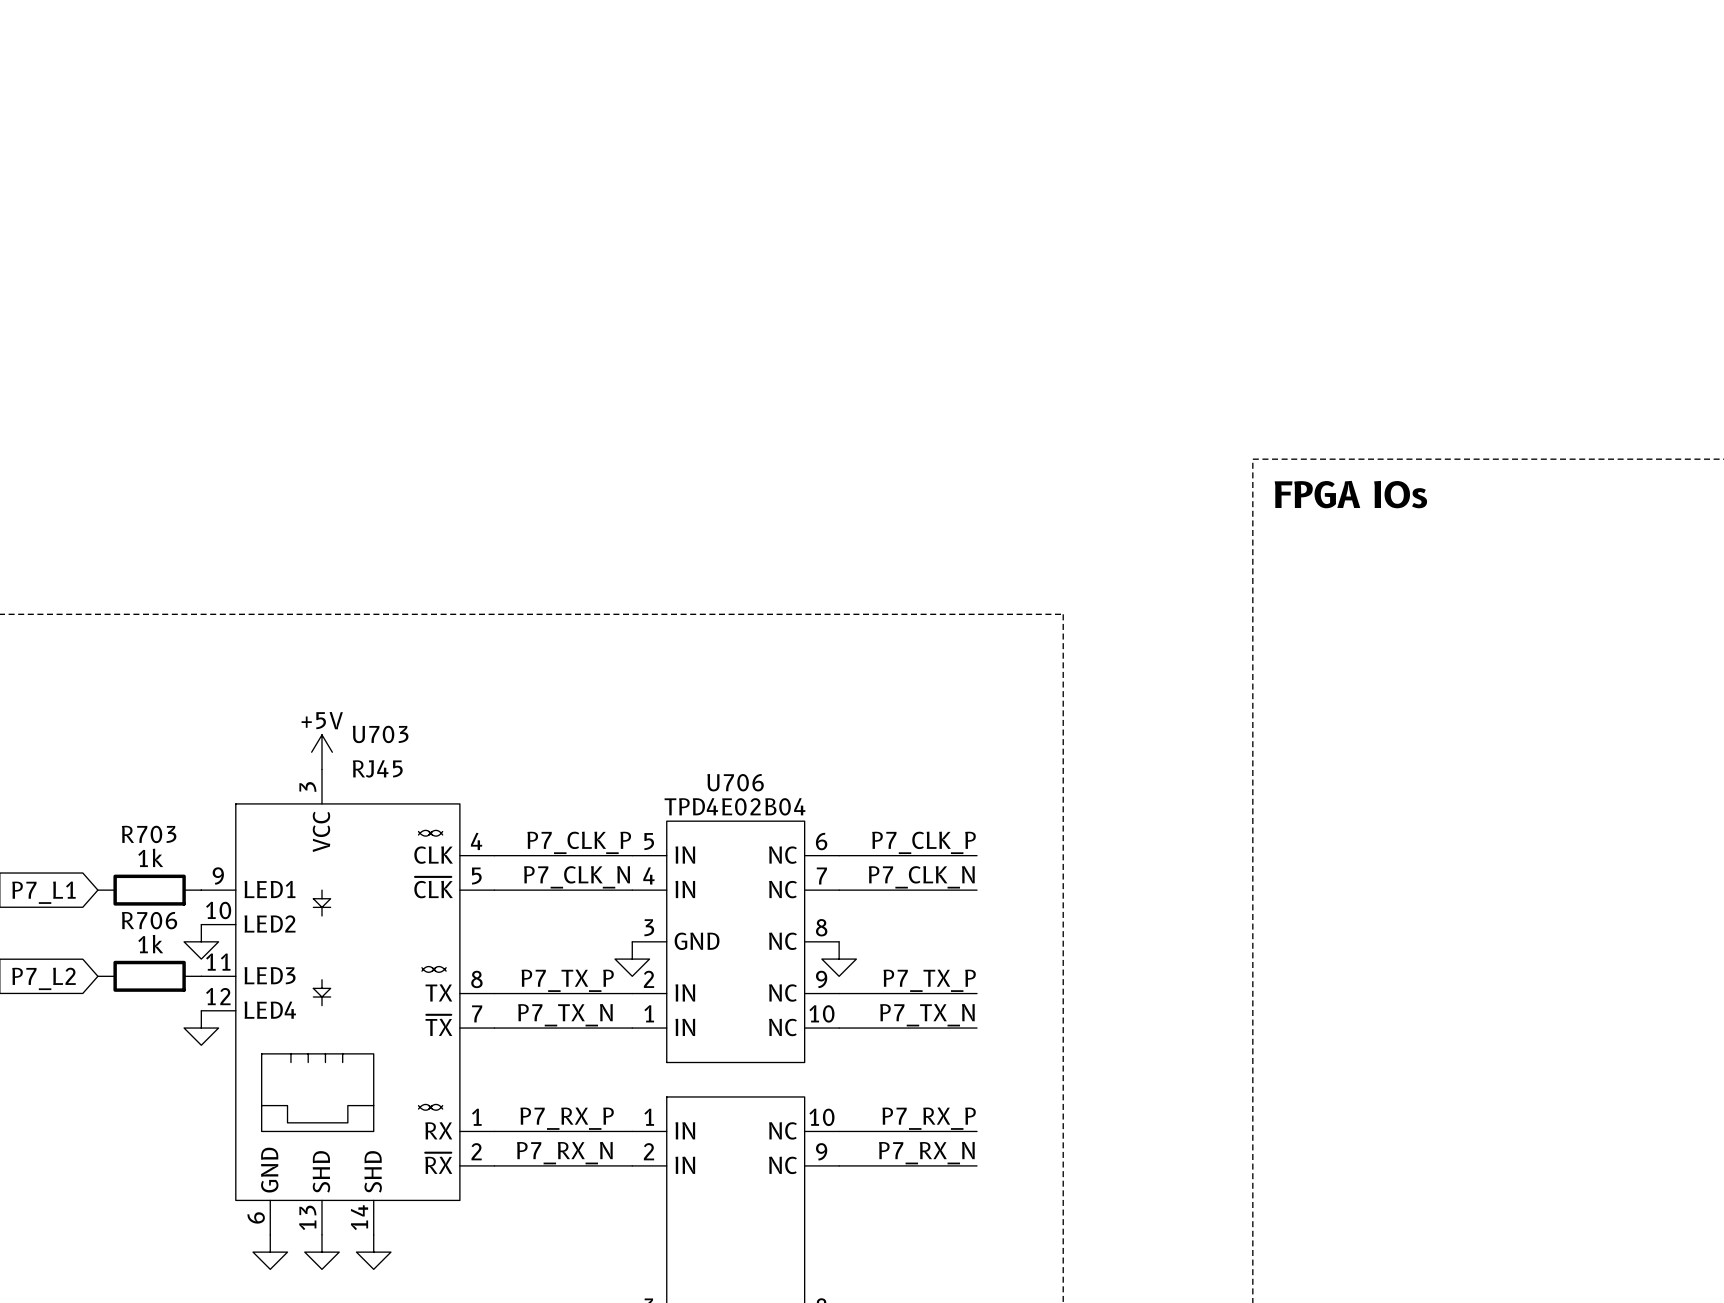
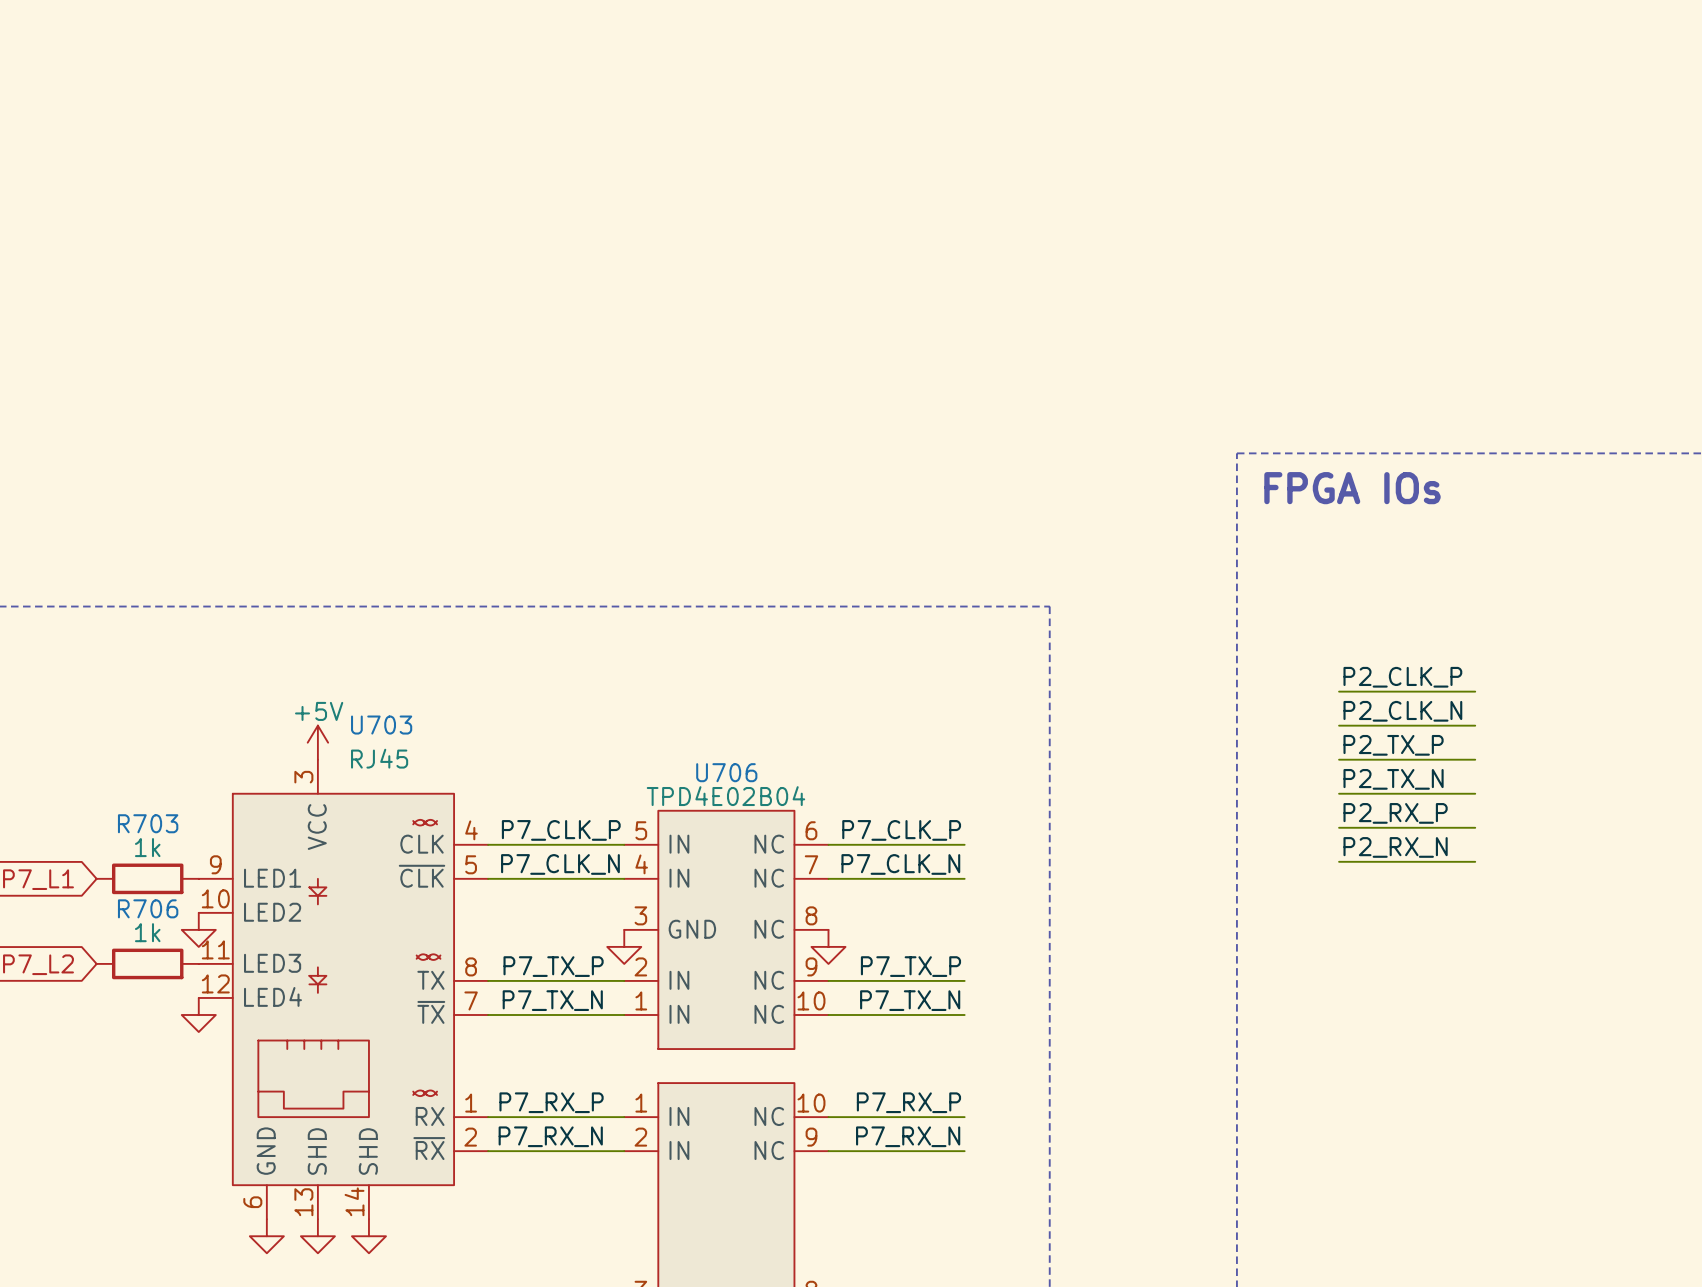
label: none -> P2_CLK_P (1402, 677)
wire: none -> (1339, 691) (1475, 691)
label: none -> P2_CLK_N (1402, 711)
wire: none -> (1339, 725) (1475, 725)
label: none -> P2_TX_P (1393, 745)
wire: none -> (1339, 759) (1475, 759)
label: none -> P2_TX_N (1393, 779)
wire: none -> (1339, 793) (1475, 793)
label: none -> P2_RX_P (1395, 813)
wire: none -> (1339, 827) (1475, 827)
label: none -> P2_RX_N (1395, 847)
wire: none -> (1339, 861) (1475, 861)

